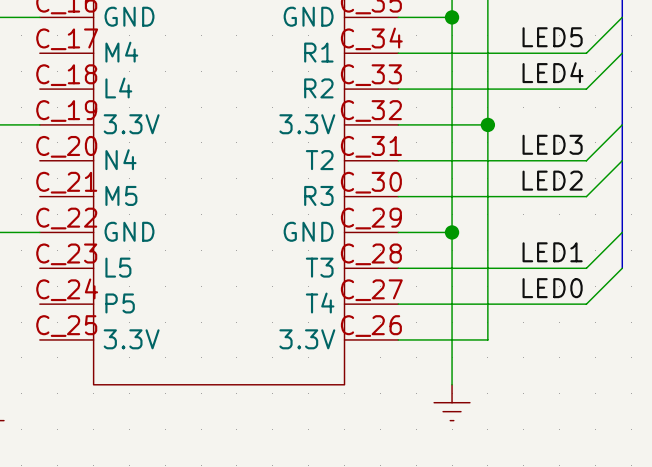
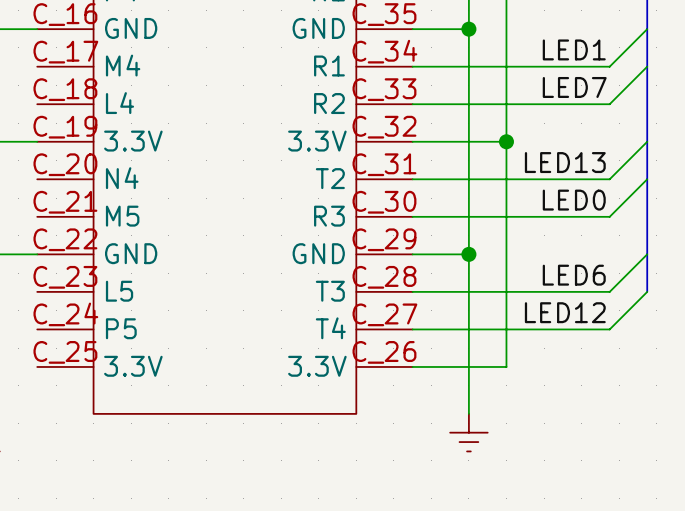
label: LED5 (552, 37) -> LED1 (574, 49)
label: LED4 (553, 72) -> LED7 (574, 87)
label: LED3 (552, 144) -> LED13 (565, 162)
label: LED2 (552, 180) -> LED0 (574, 200)
label: LED1 (552, 252) -> LED6 (574, 275)
label: LED0 (552, 288) -> LED12 (565, 312)

